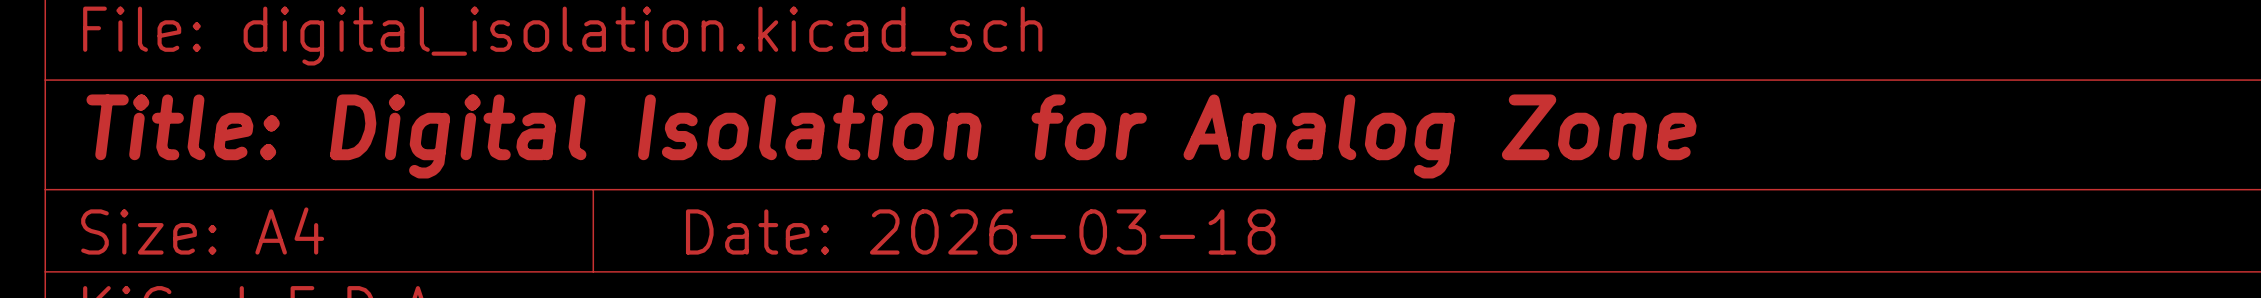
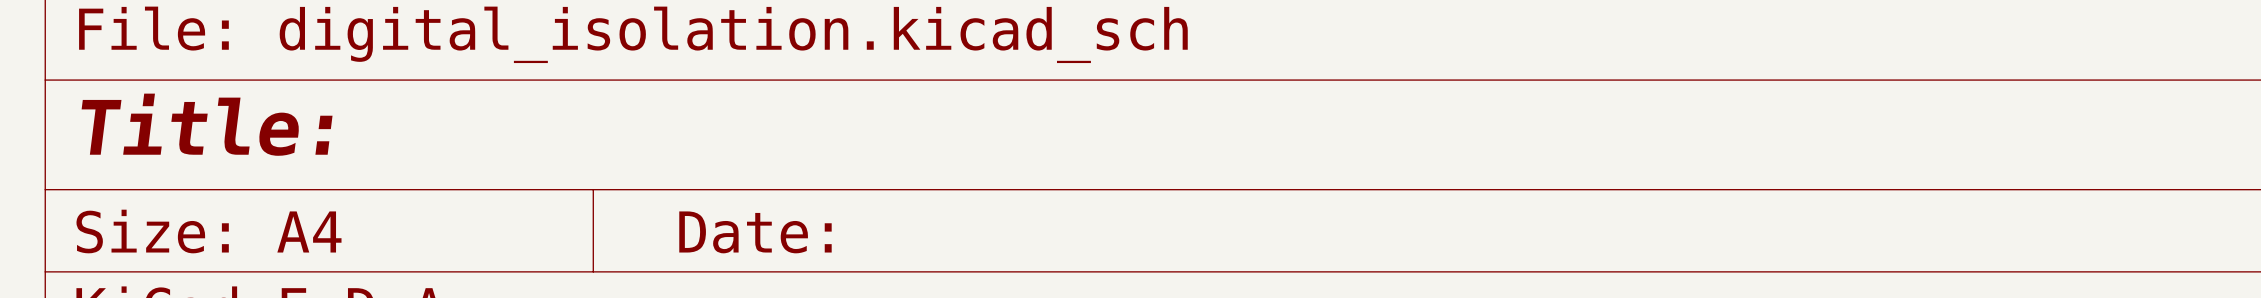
title block: Title: Digital Isolation for Analog Zone (891, 136) -> Title: (207, 124)
title block: Date: 2026-03-18 (980, 231) -> Date: (755, 232)

